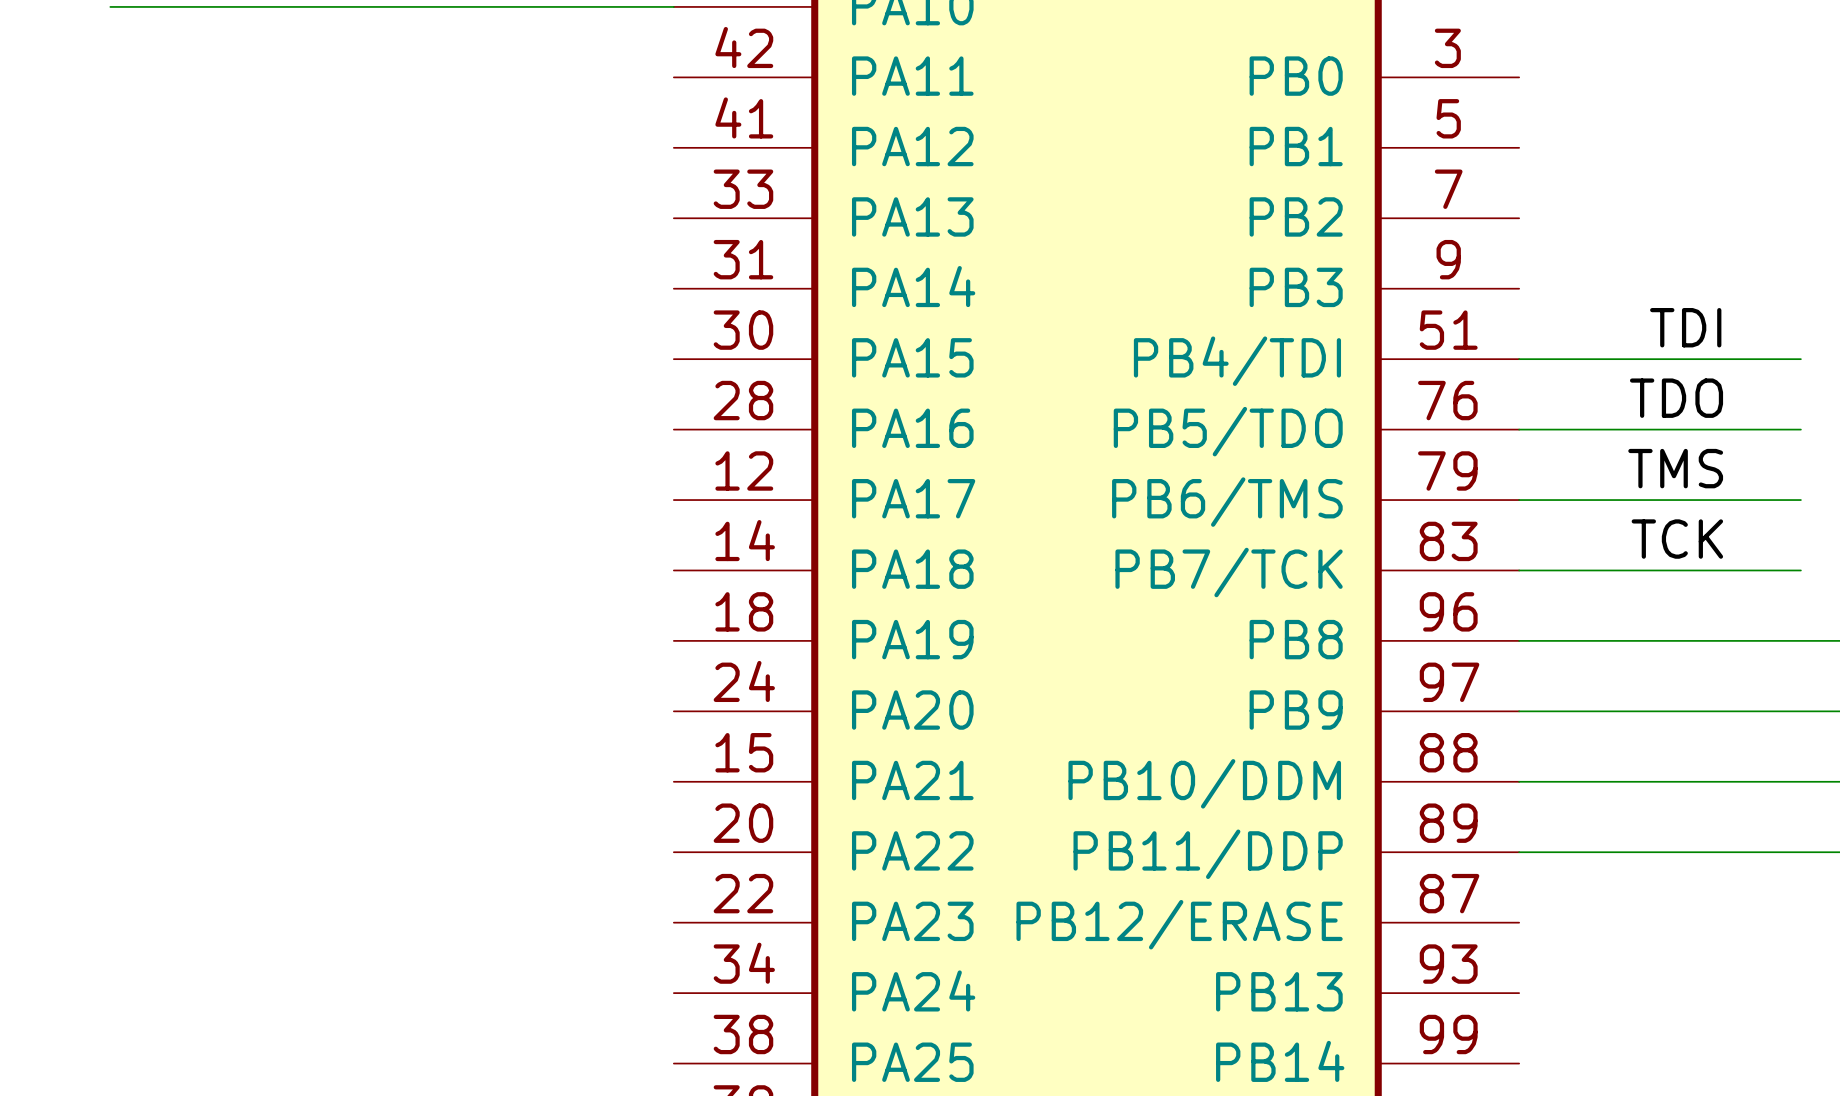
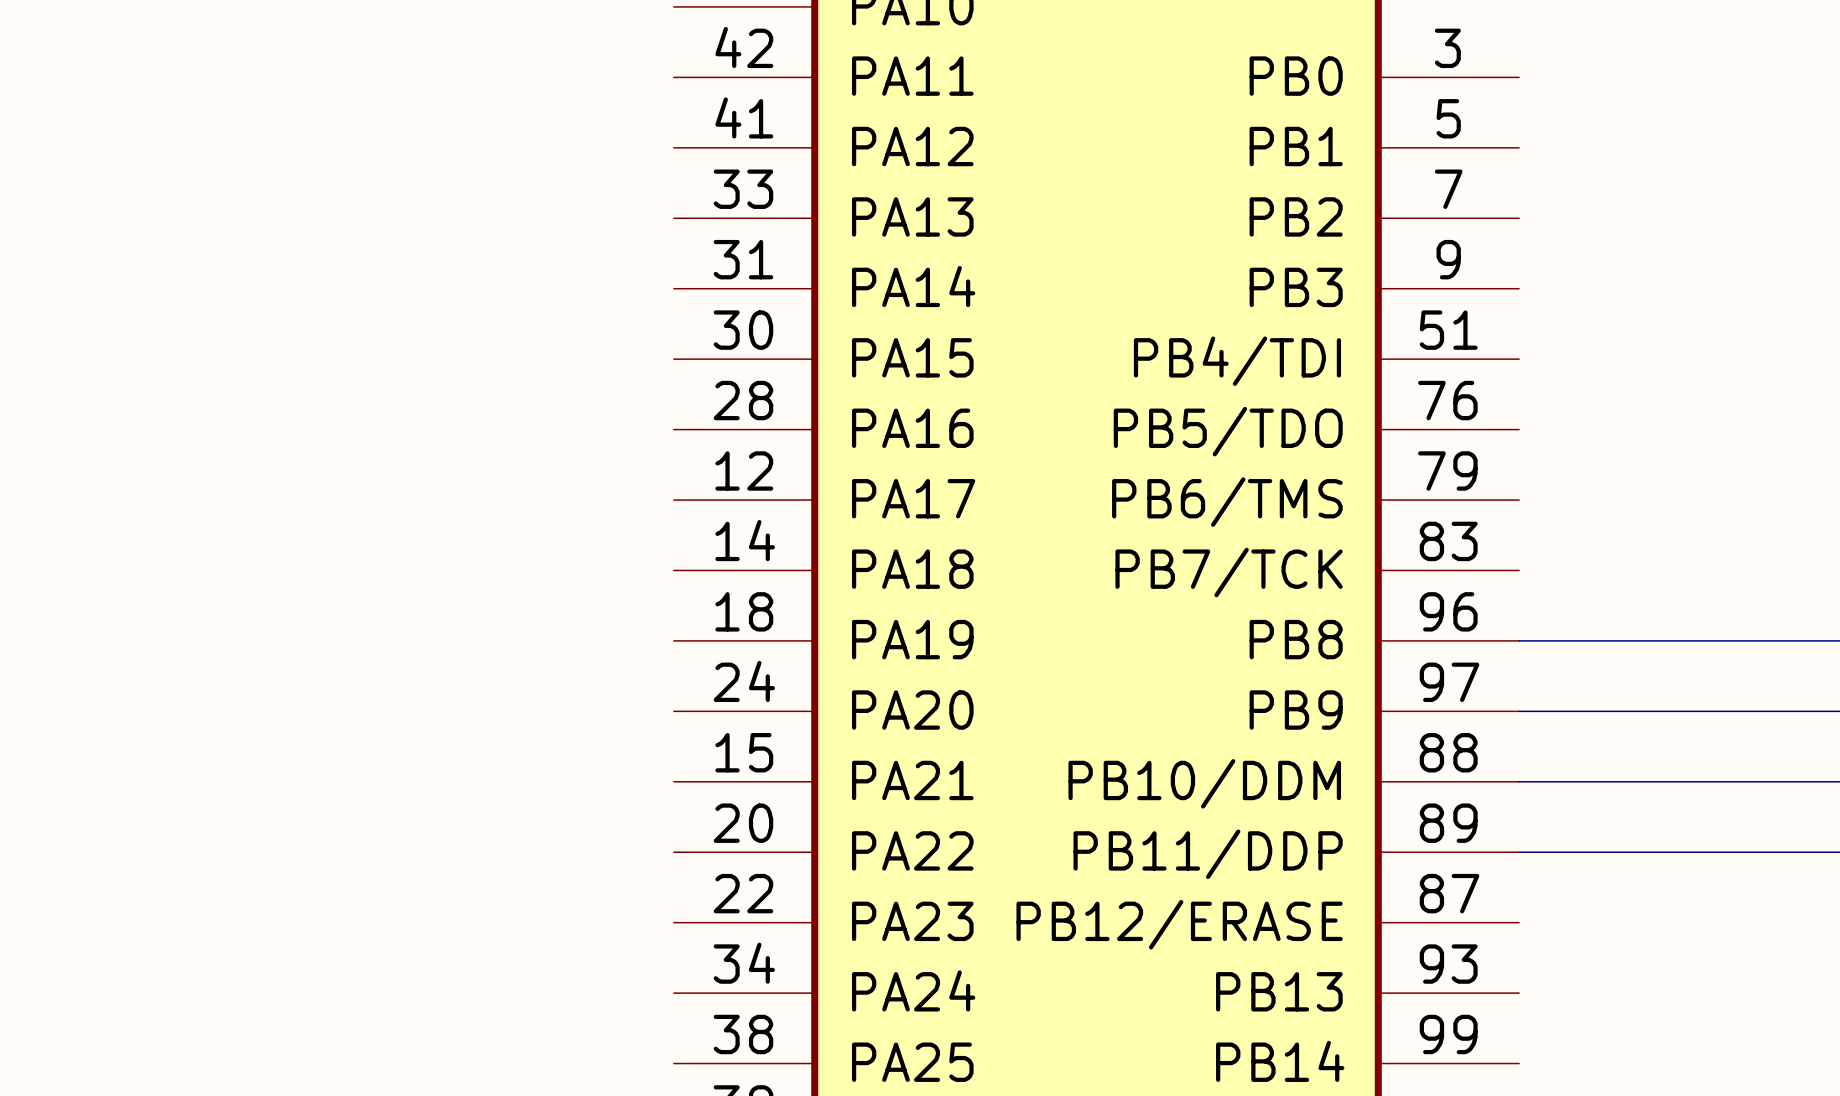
wire: (110, 6) (673, 6) -> none
label: TDI (1685, 327) -> none
wire: (1519, 359) (1800, 359) -> none
label: TDO (1676, 398) -> none
wire: (1519, 429) (1800, 429) -> none
label: TMS (1675, 468) -> none
wire: (1519, 500) (1800, 500) -> none
label: TCK (1677, 539) -> none
wire: (1519, 570) (1800, 570) -> none

